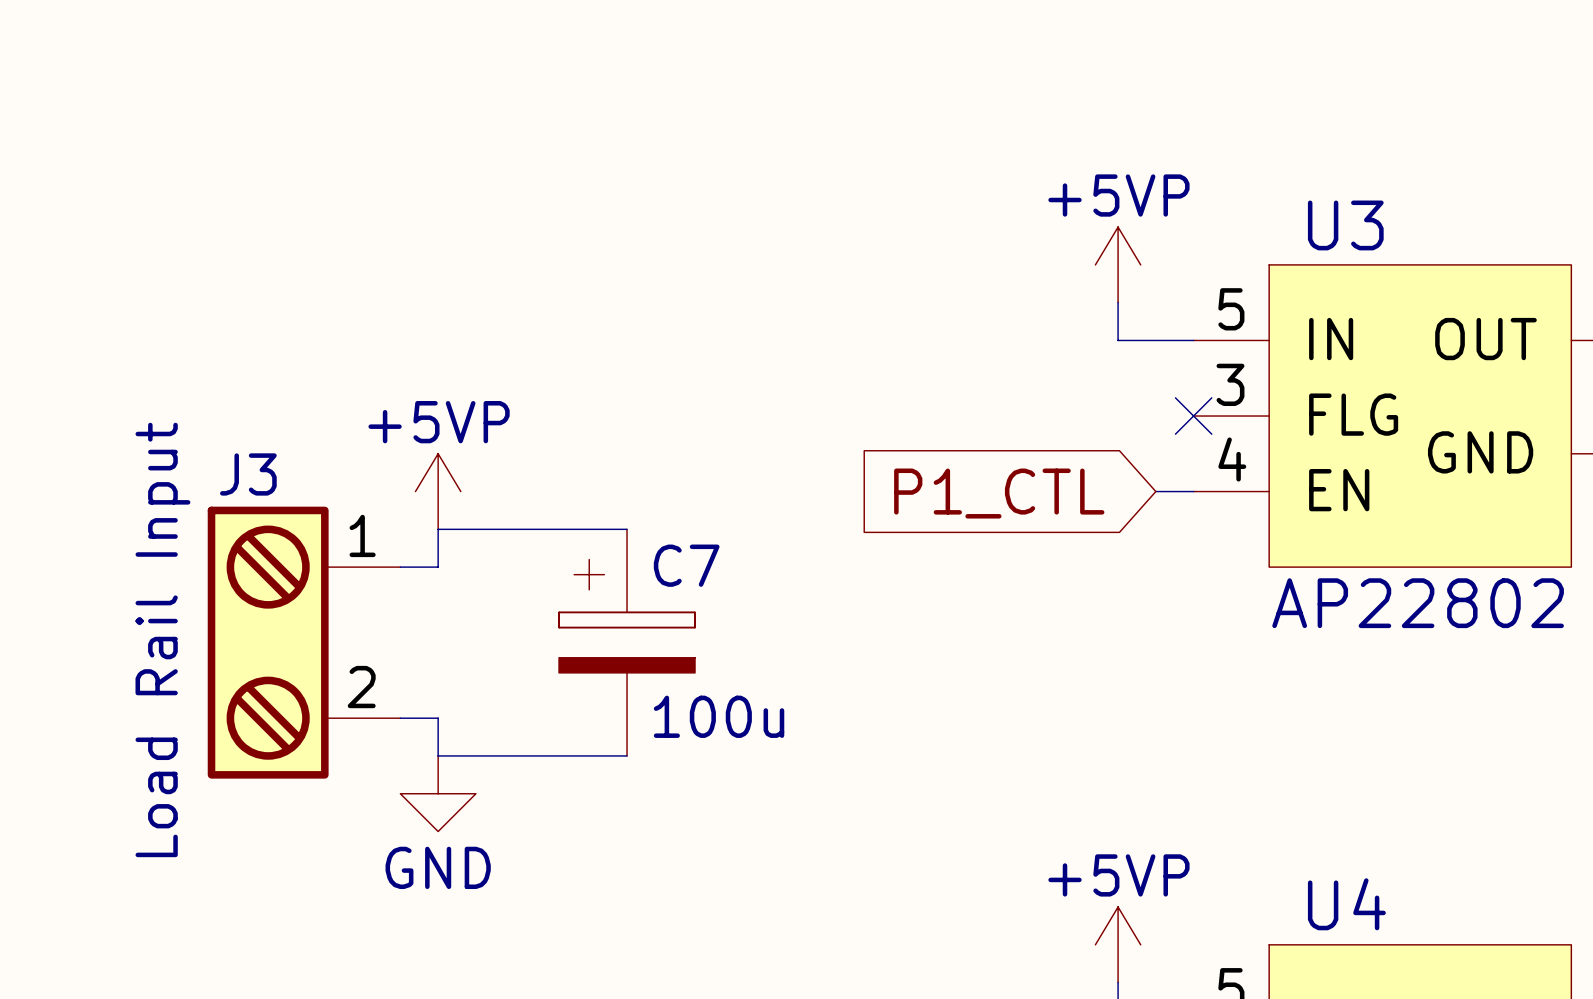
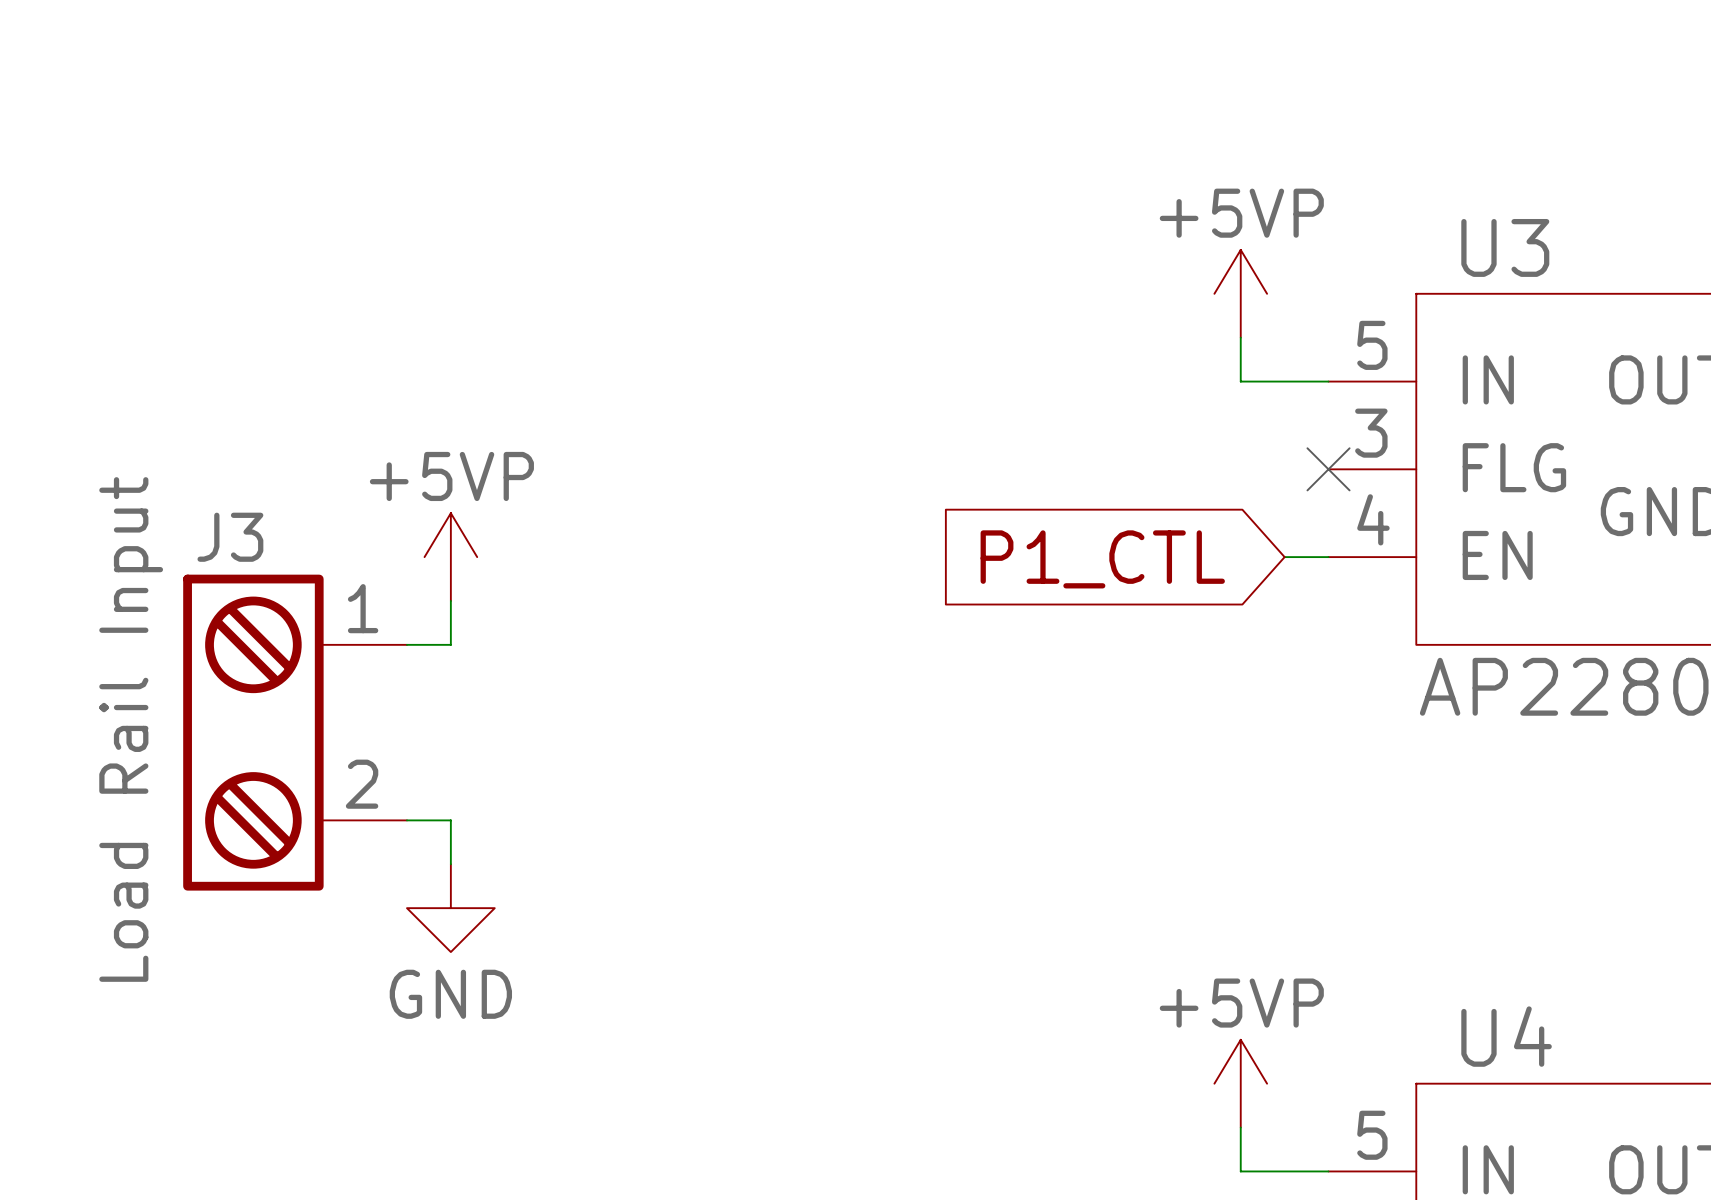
wire: (438, 529) (627, 529) -> none
C7: 100u (627, 642) -> none
wire: (438, 755) (627, 755) -> none

